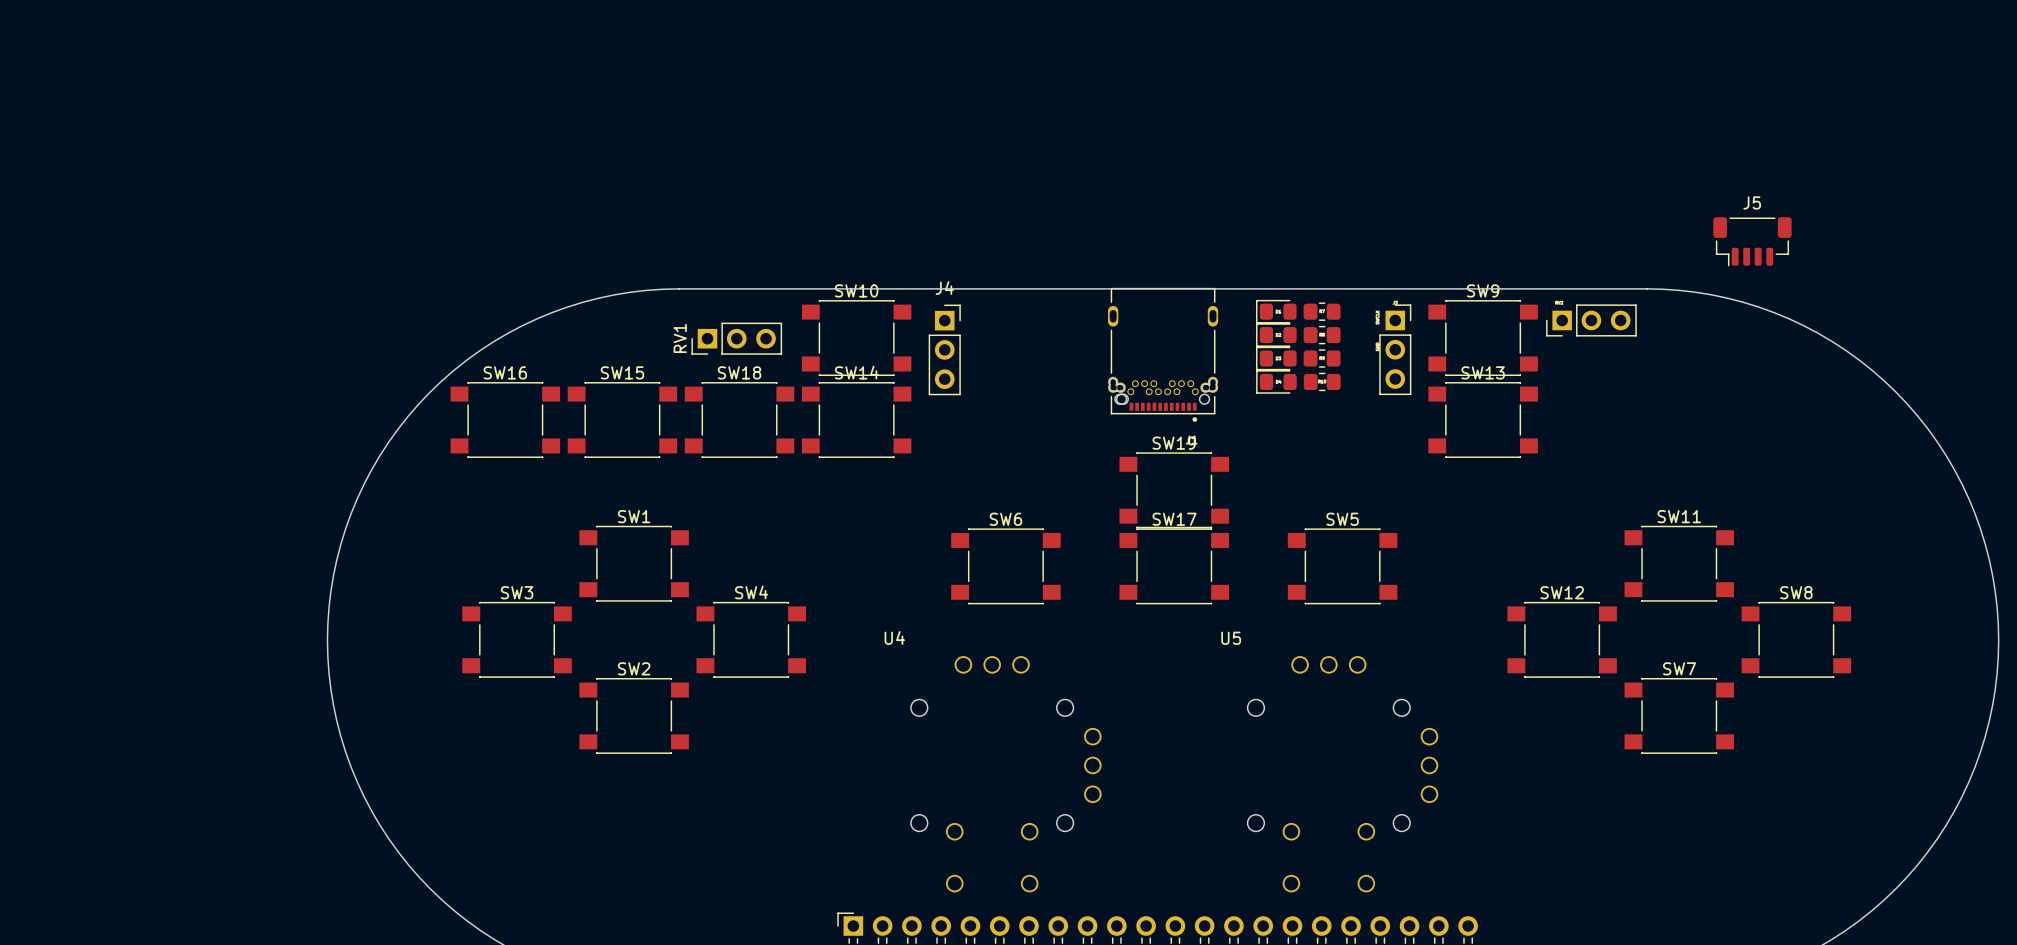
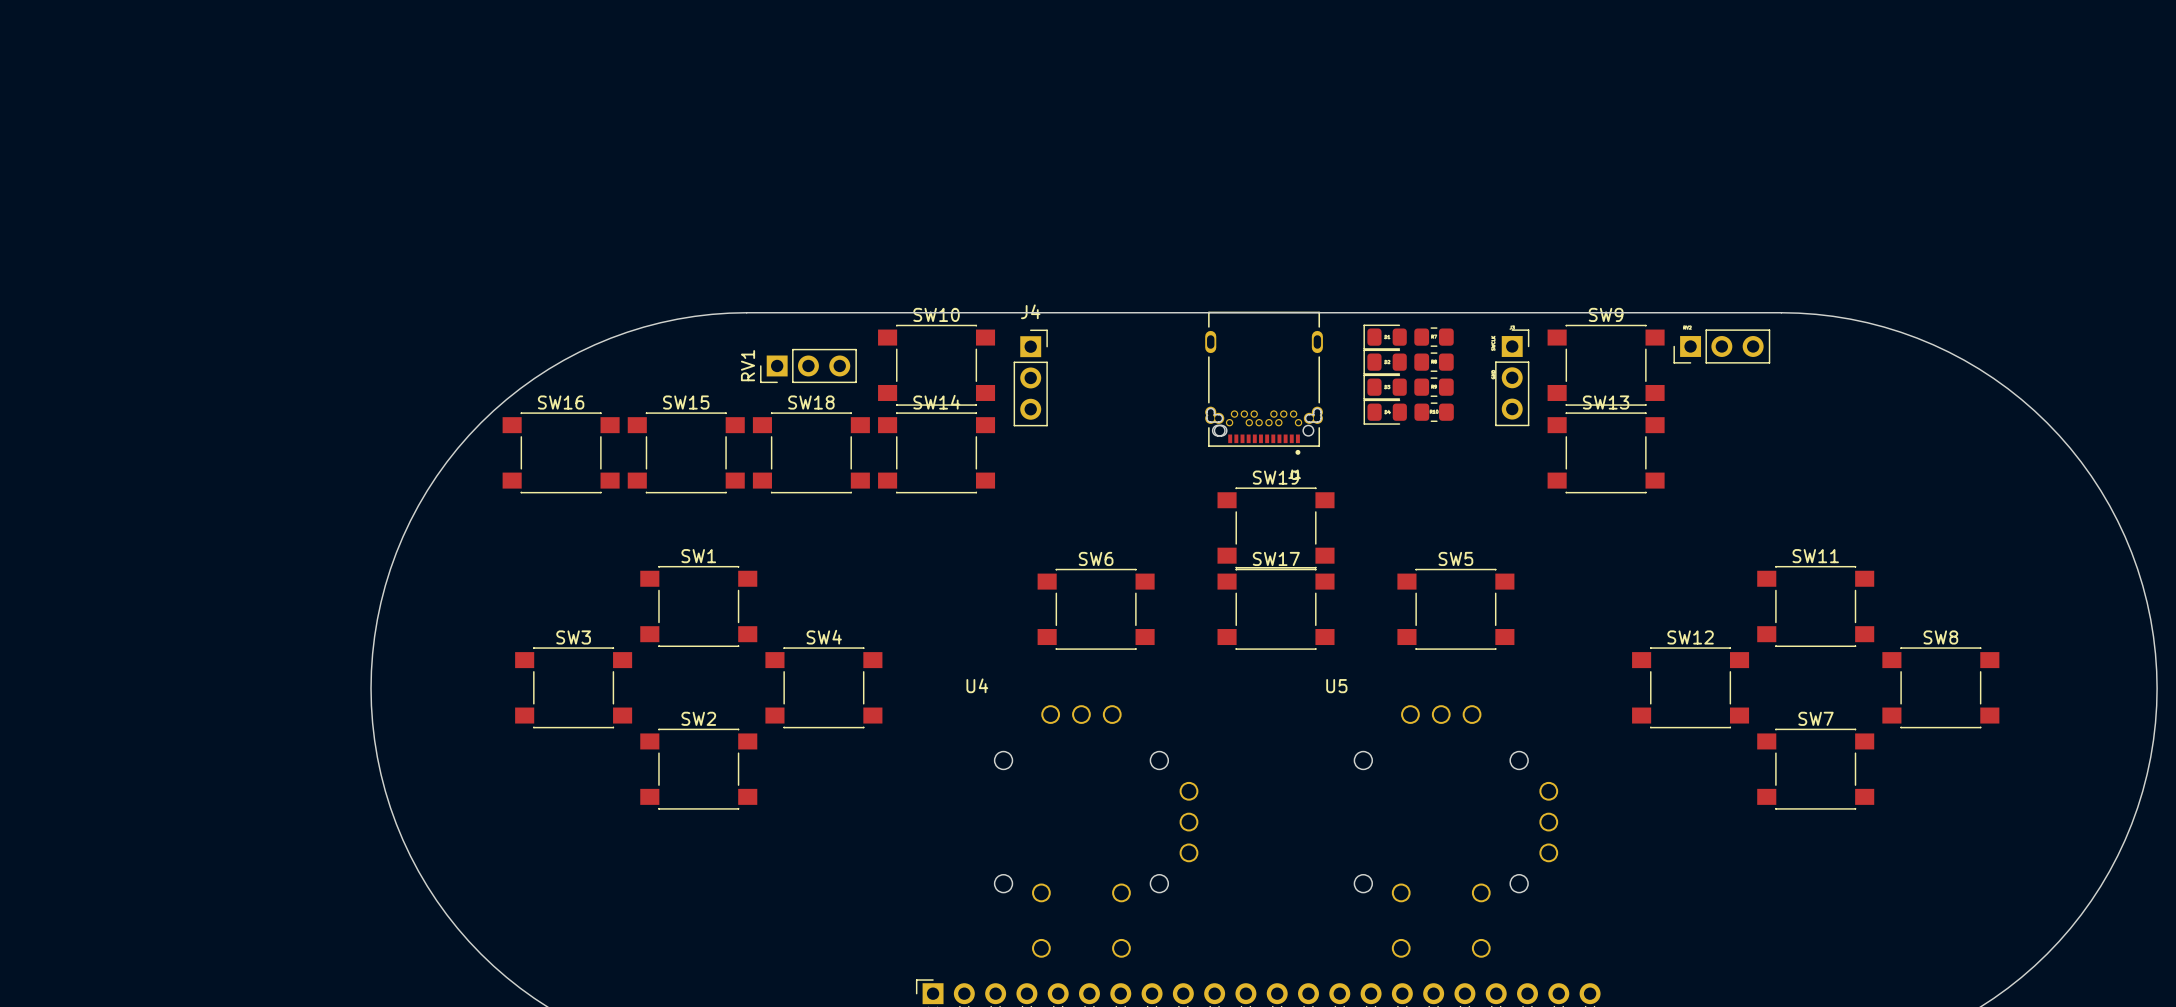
J5: (1752, 241) -> none

